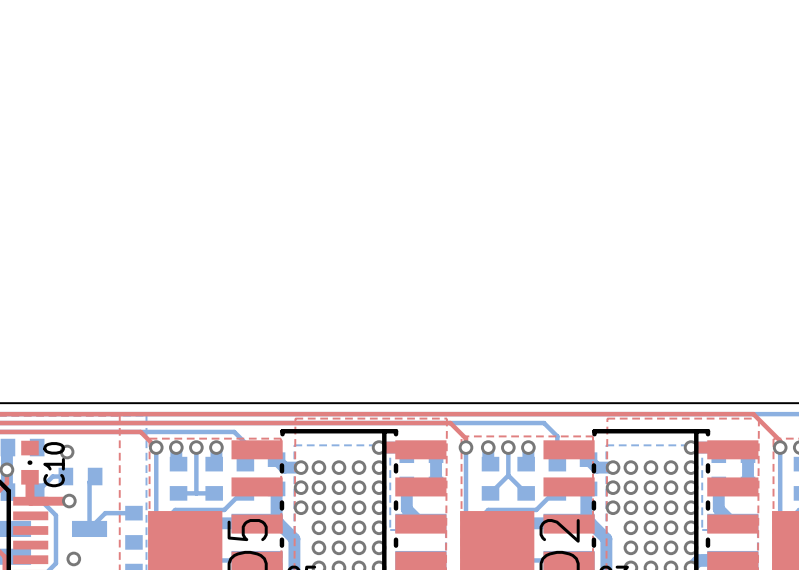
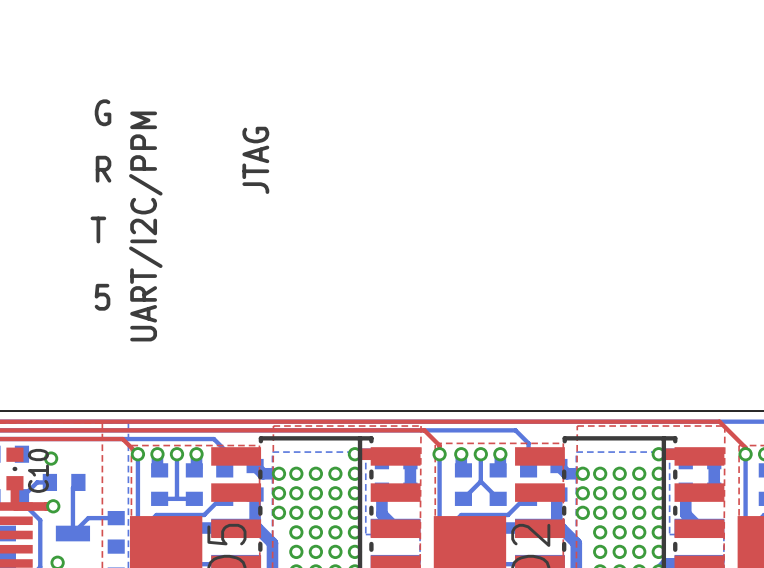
text: none -> G (103, 112)
text: none -> JTAG (255, 160)
text: none -> R (103, 169)
text: none -> UART/I2C/PPM (145, 226)
text: none -> T (98, 229)
text: none -> 5 (102, 297)

